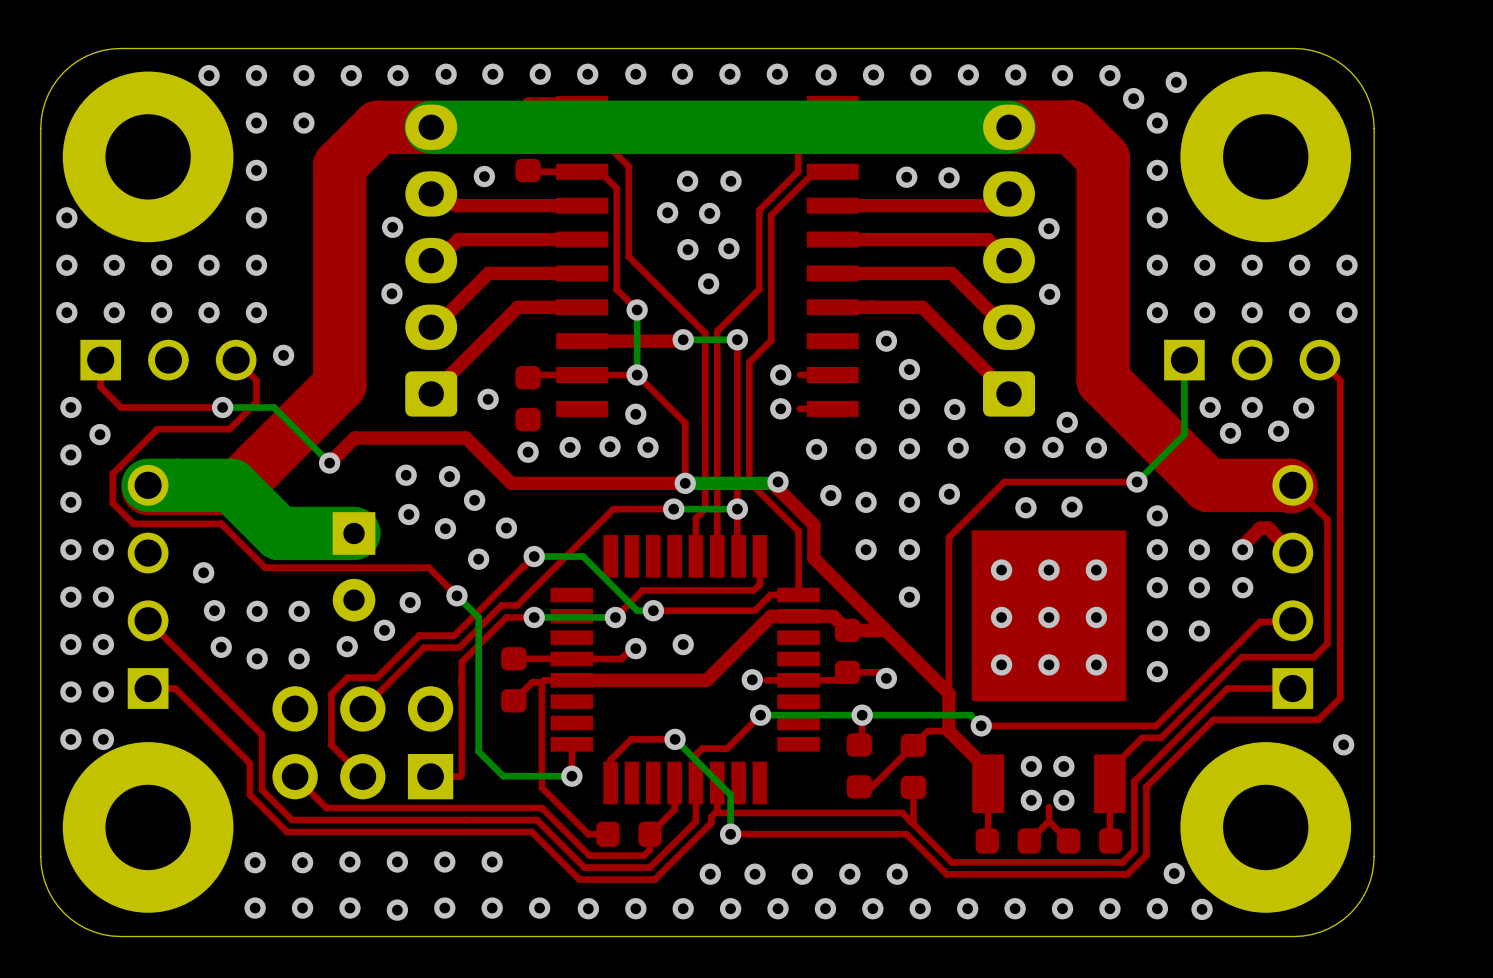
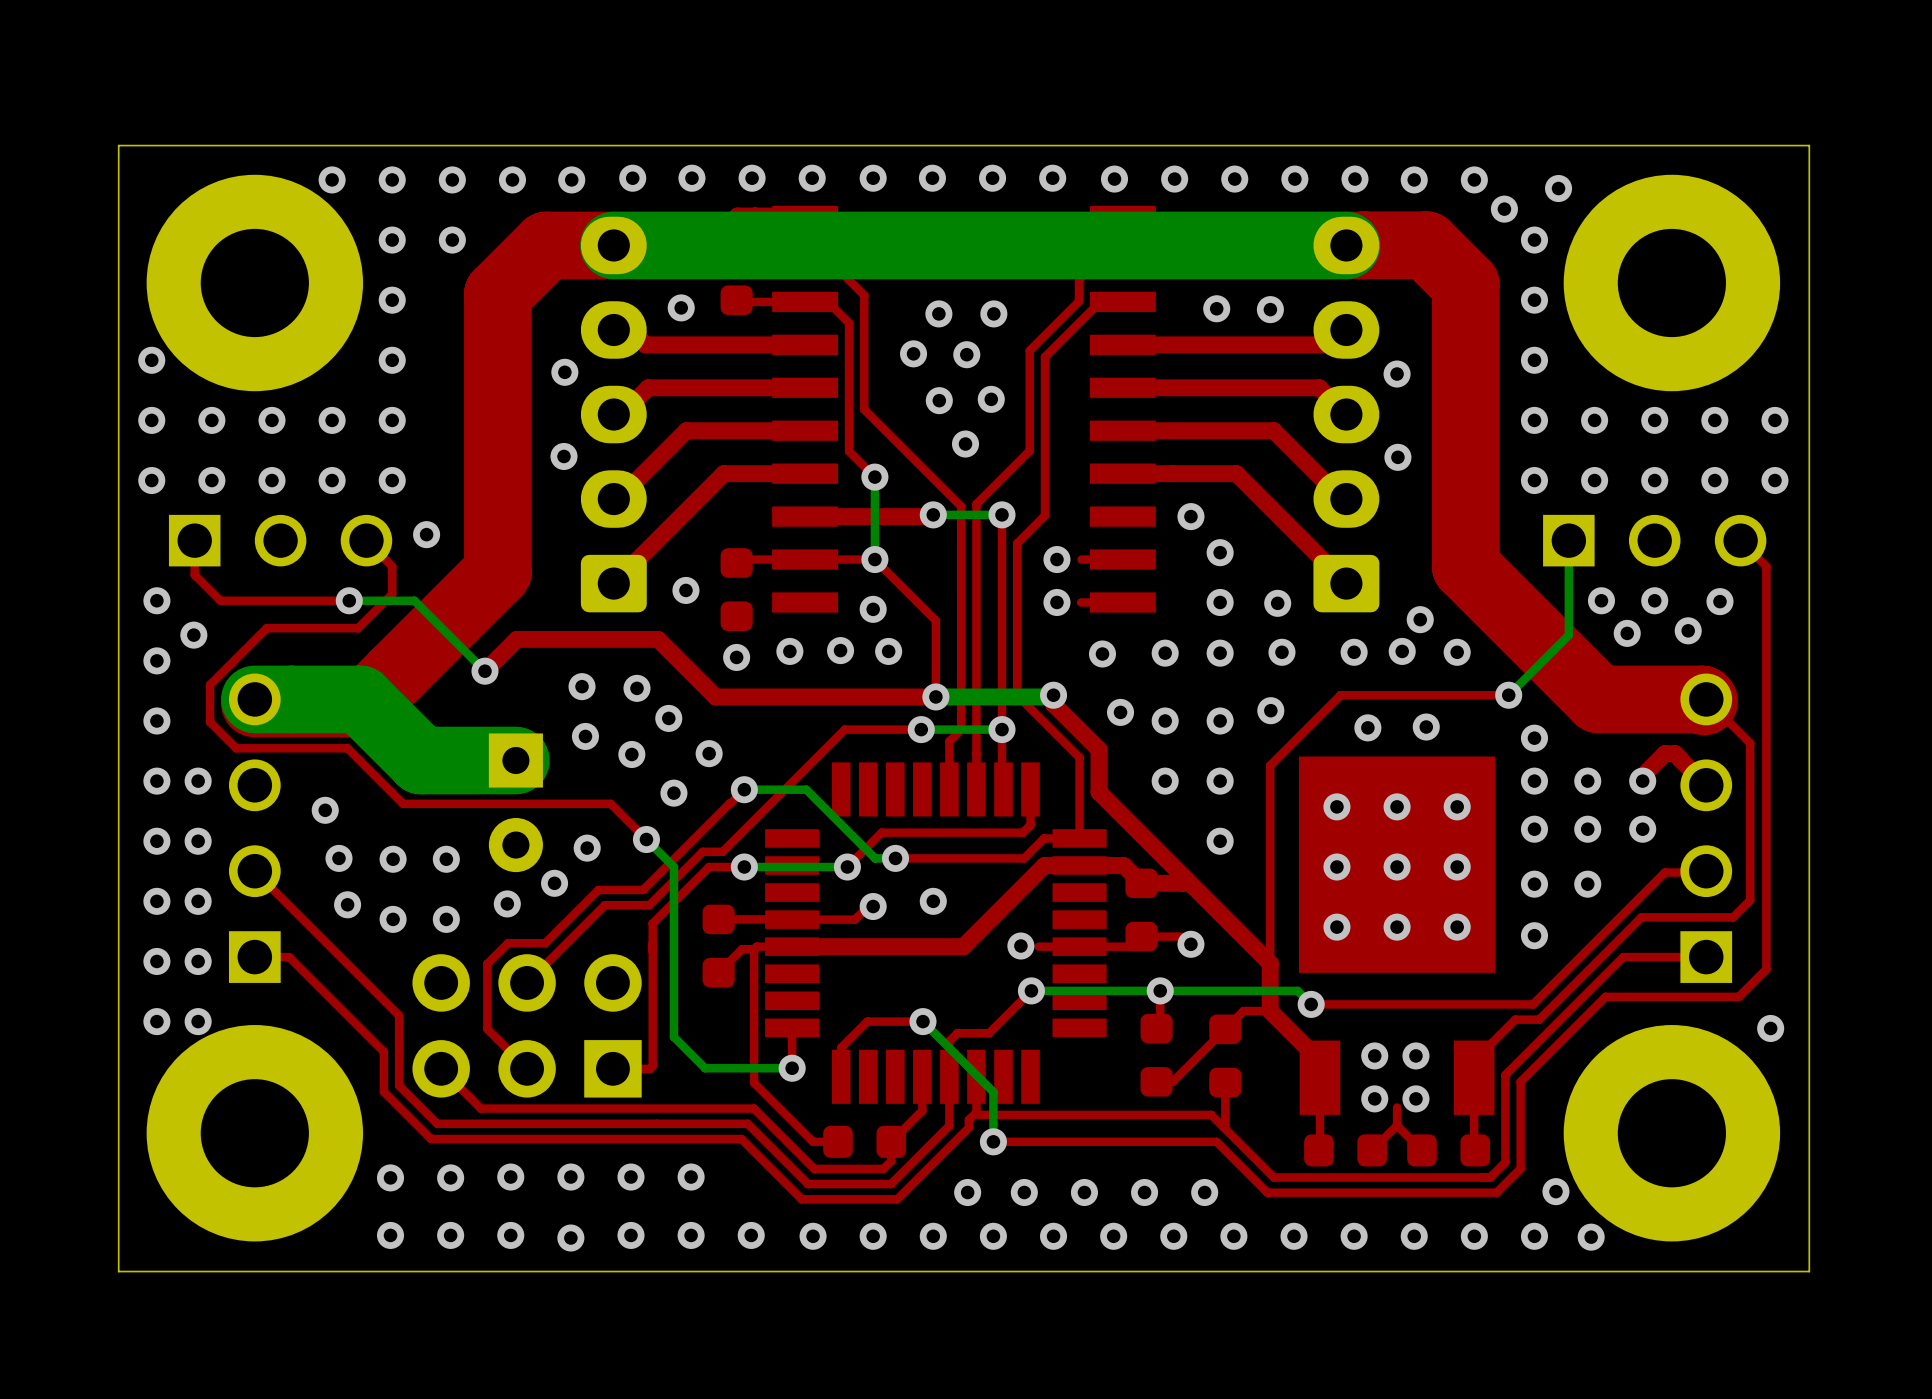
board edge: (120, 48) (94, 52) (78, 60) (64, 71) (48, 93) (42, 110) (40, 128) -> (220, 145) (118, 145) (118, 247)
board edge: (1294, 48) (1320, 52) (1336, 60) (1350, 71) (1361, 85) (1369, 102) (1374, 128) -> (1707, 145) (1809, 145) (1809, 247)
board edge: (40, 856) (45, 882) (52, 899) (64, 913) (86, 928) (102, 934) (120, 936) -> (118, 1170) (118, 1271) (220, 1271)
board edge: (1374, 856) (1372, 874) (1366, 891) (1350, 913) (1336, 924) (1320, 932) (1294, 936) -> (1809, 1170) (1809, 1271) (1707, 1271)

